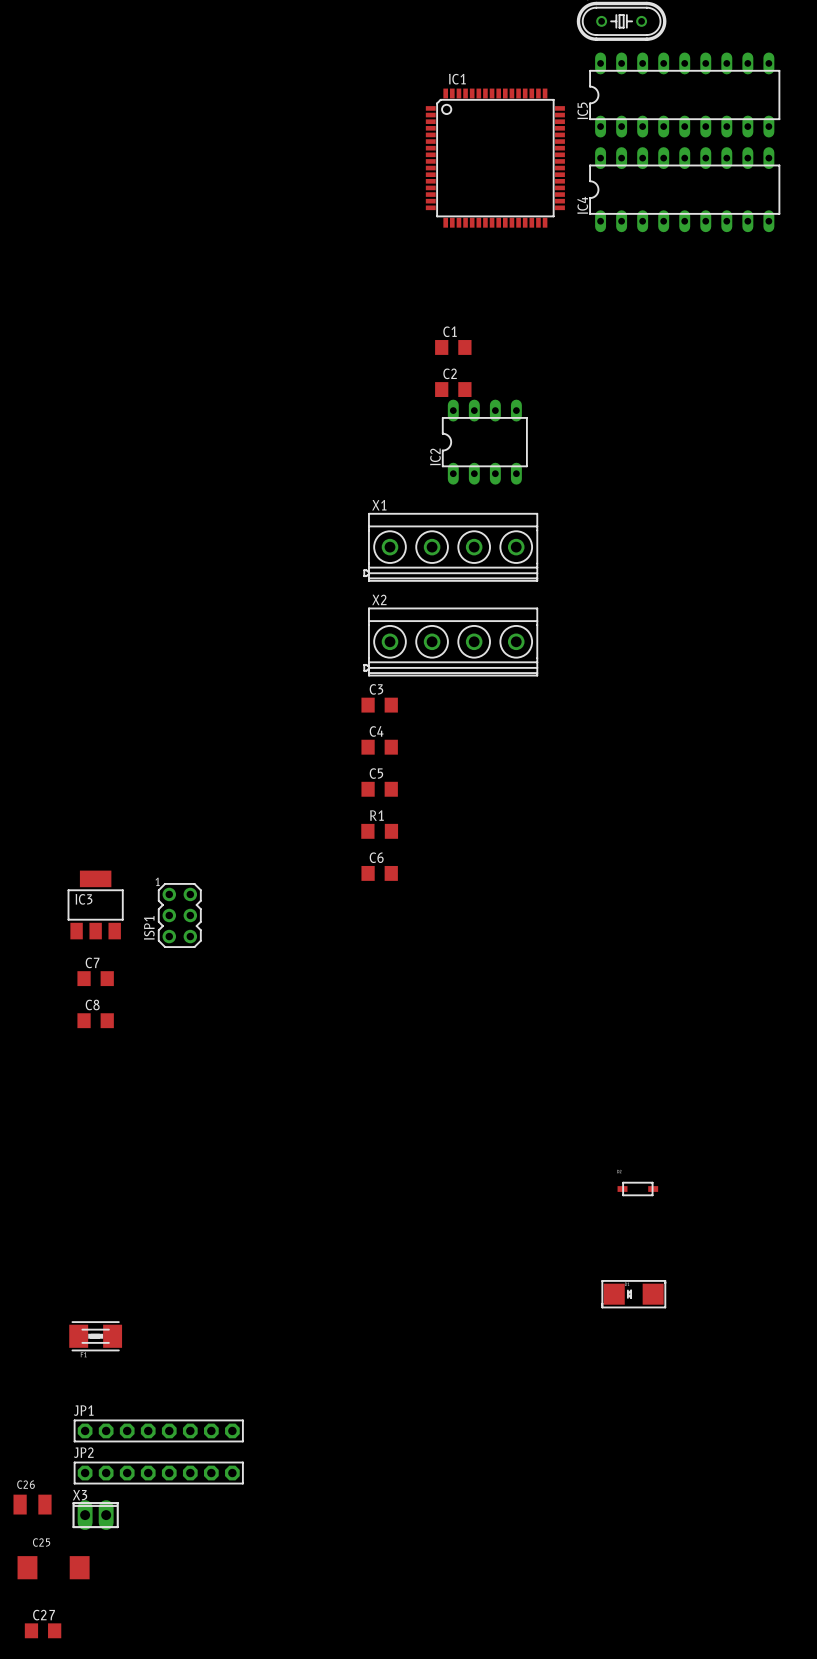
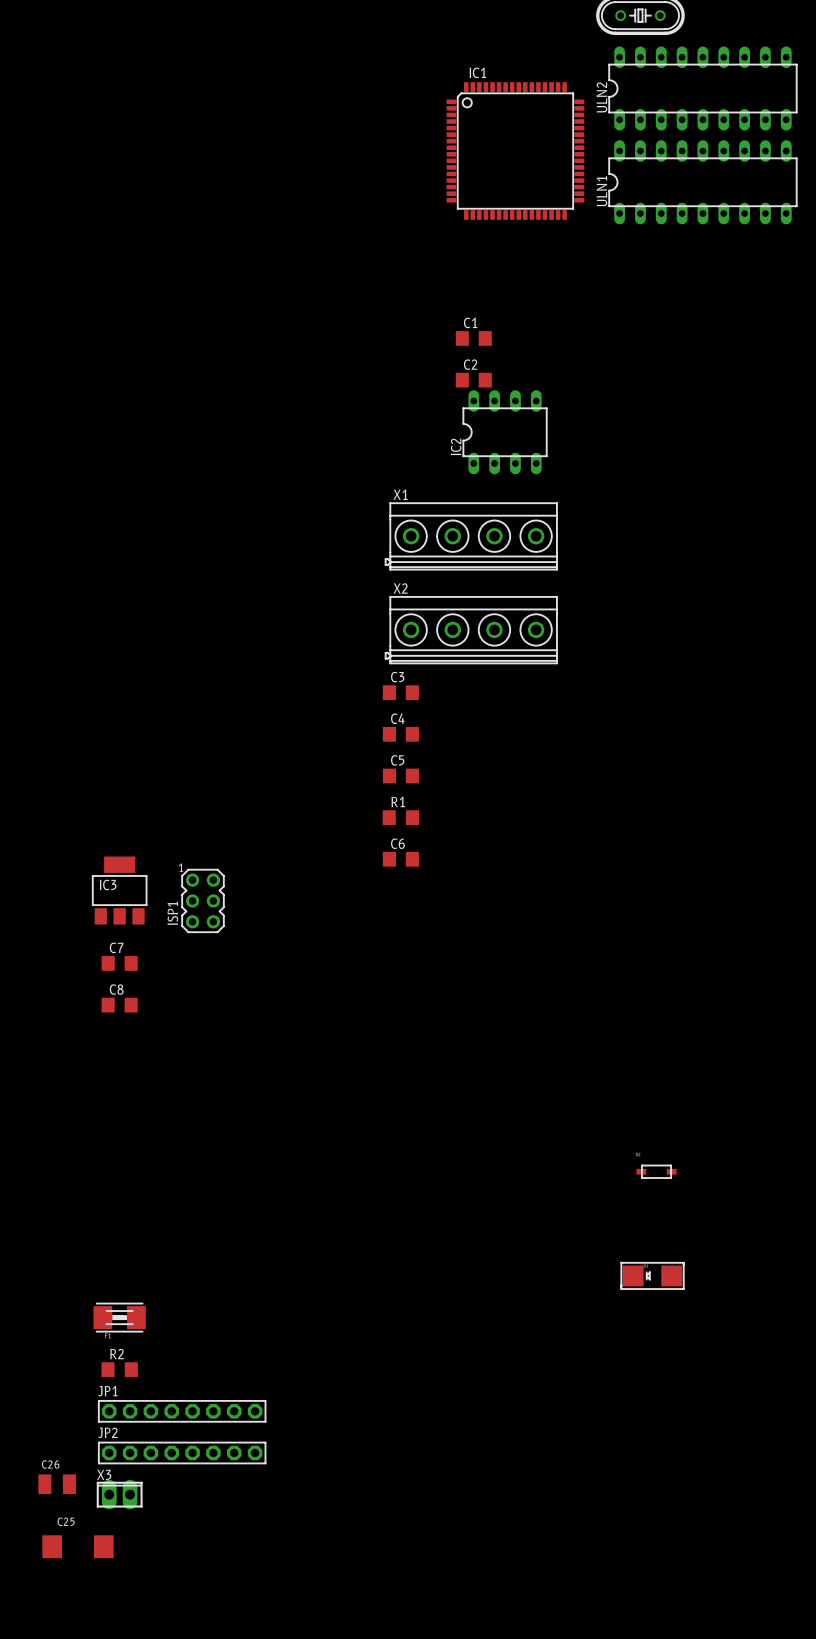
IC5 name: IC5 (582, 110) -> ULN2 (601, 97)
IC4 name: IC4 (582, 205) -> ULN1 (601, 191)
R2: none -> (119, 1369)
C27: (43, 1630) -> none

